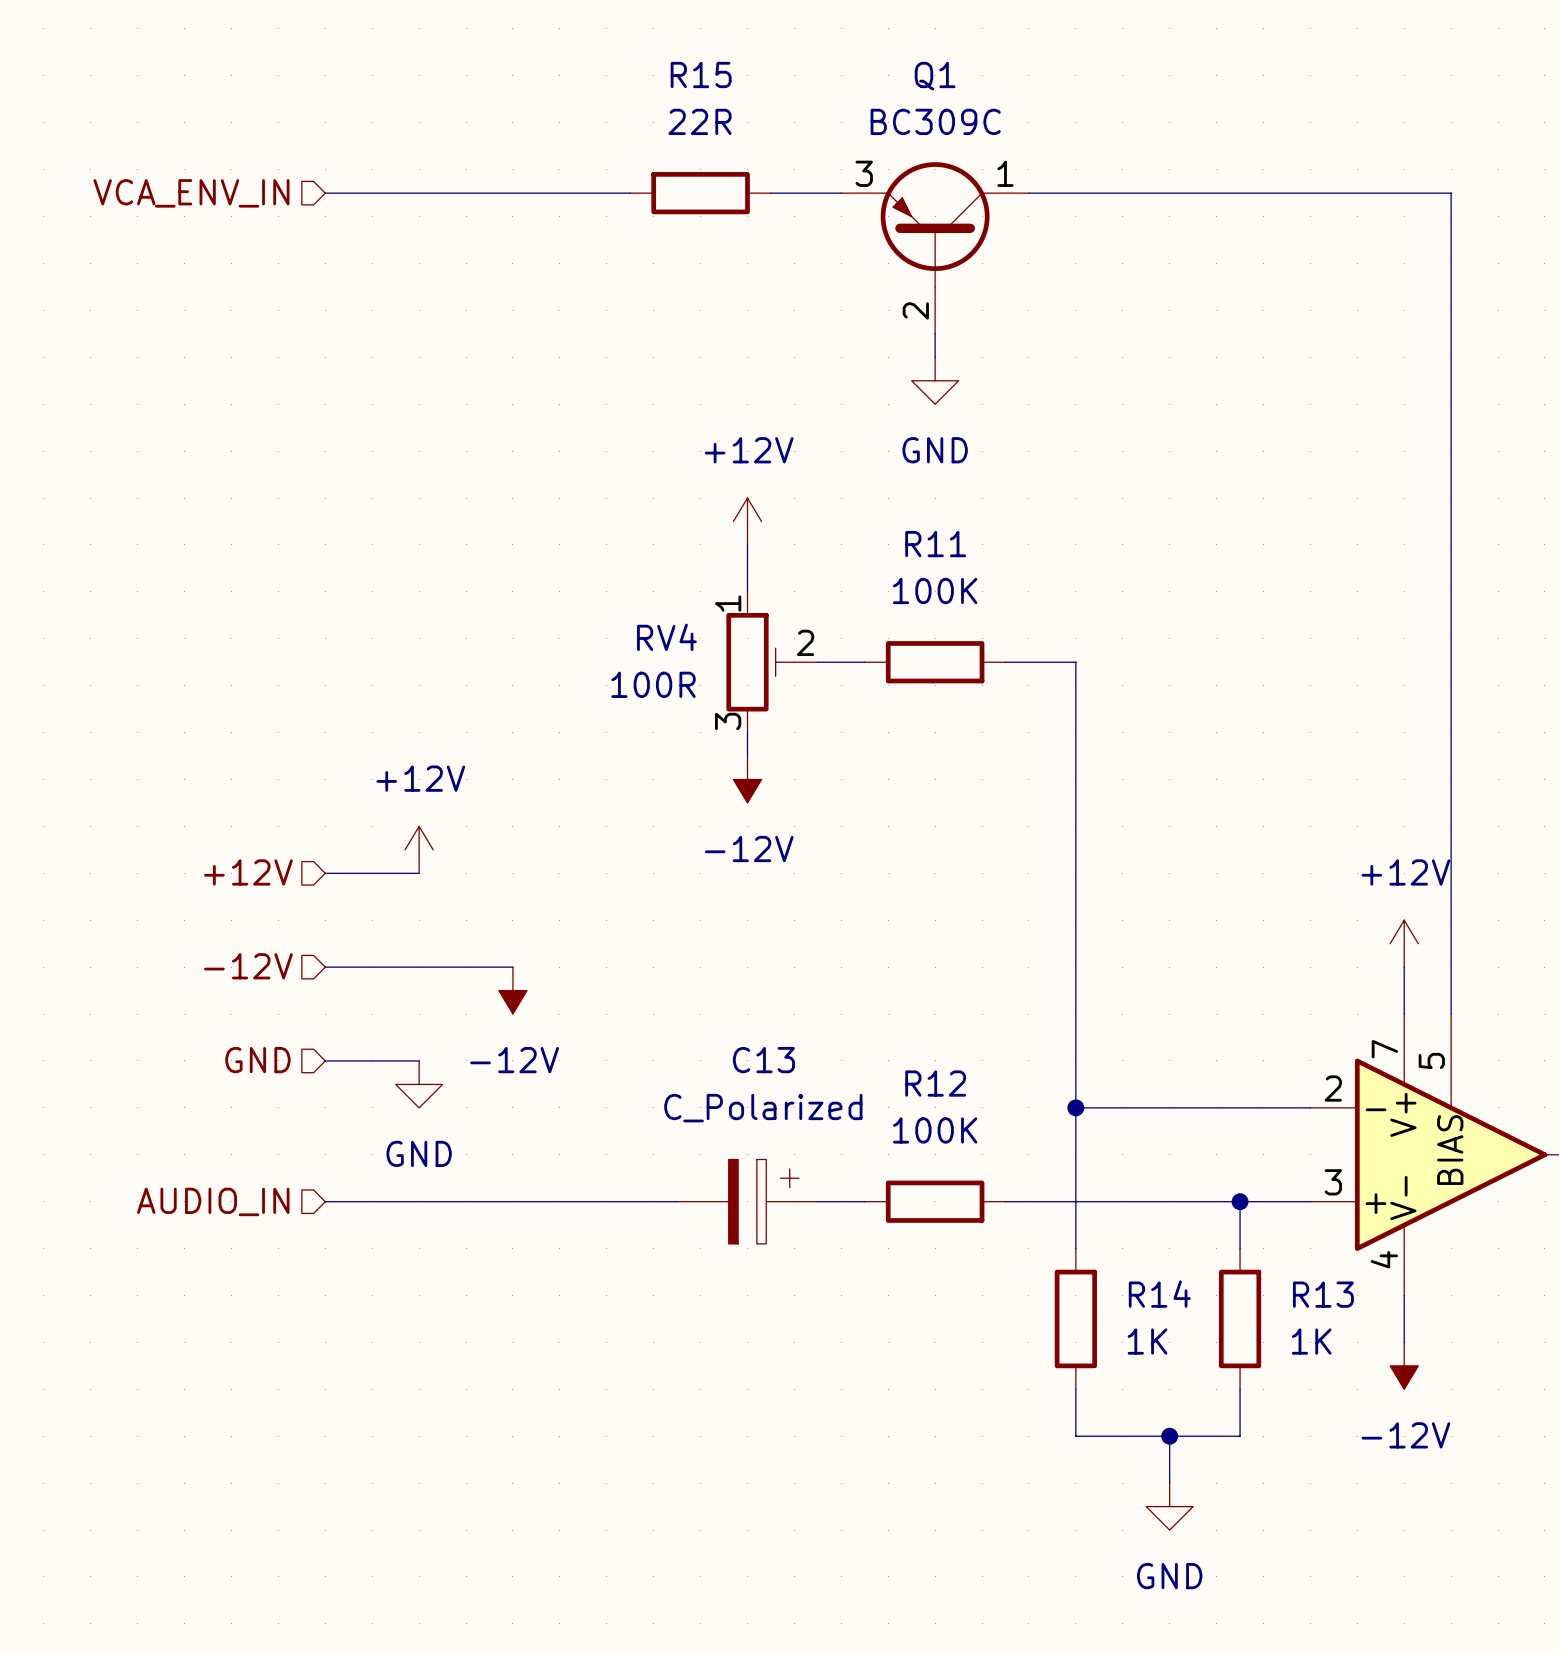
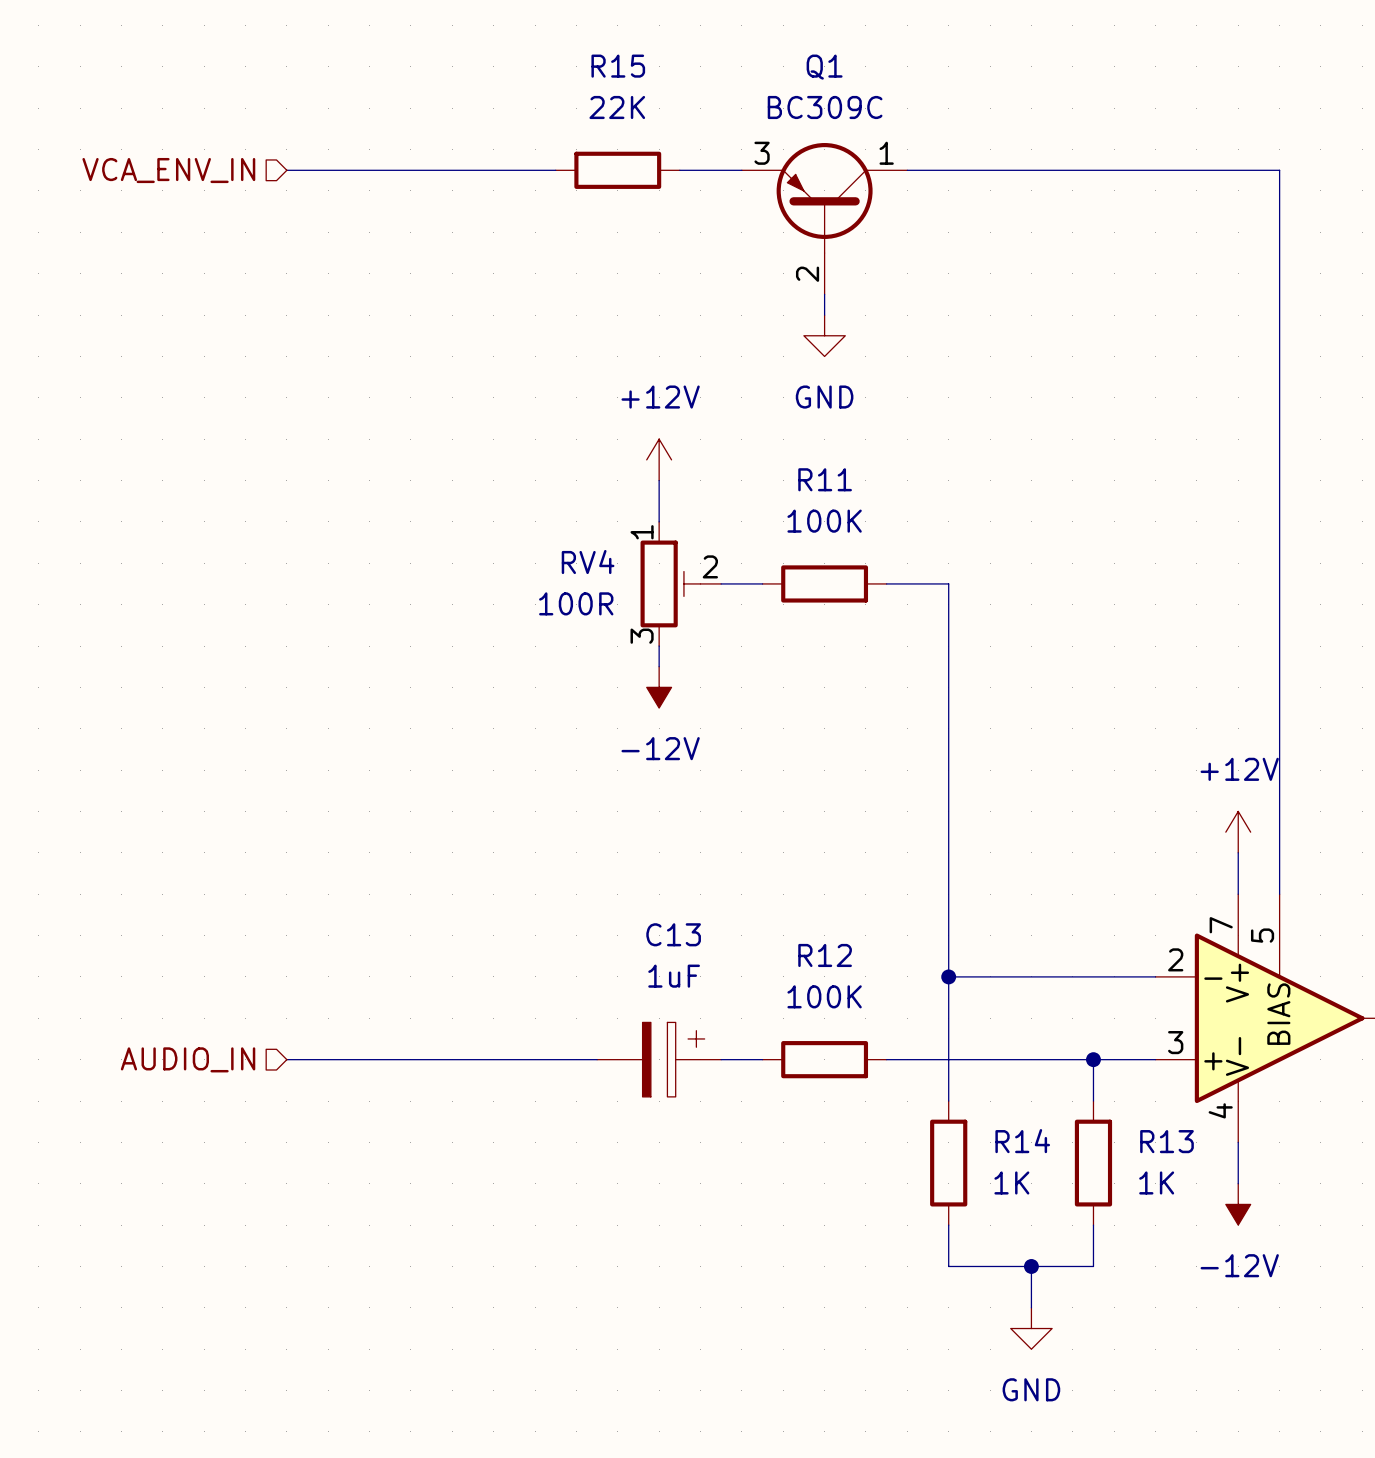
R15 value: 22R (700, 121) -> 22K (617, 107)
power symbol: +12V (419, 849) -> none
hierarchical label: +12V (248, 872) -> none
wire: (325, 873) (419, 873) -> none
hierarchical label: -12V (248, 966) -> none
wire: (325, 967) (512, 967) -> none
power symbol: -12V (512, 990) -> none
hierarchical label: GND (257, 1060) -> none
wire: (325, 1060) (419, 1060) -> none
power symbol: GND (419, 1084) -> none
C13 value: C_Polarized (763, 1108) -> 1uF (674, 976)

